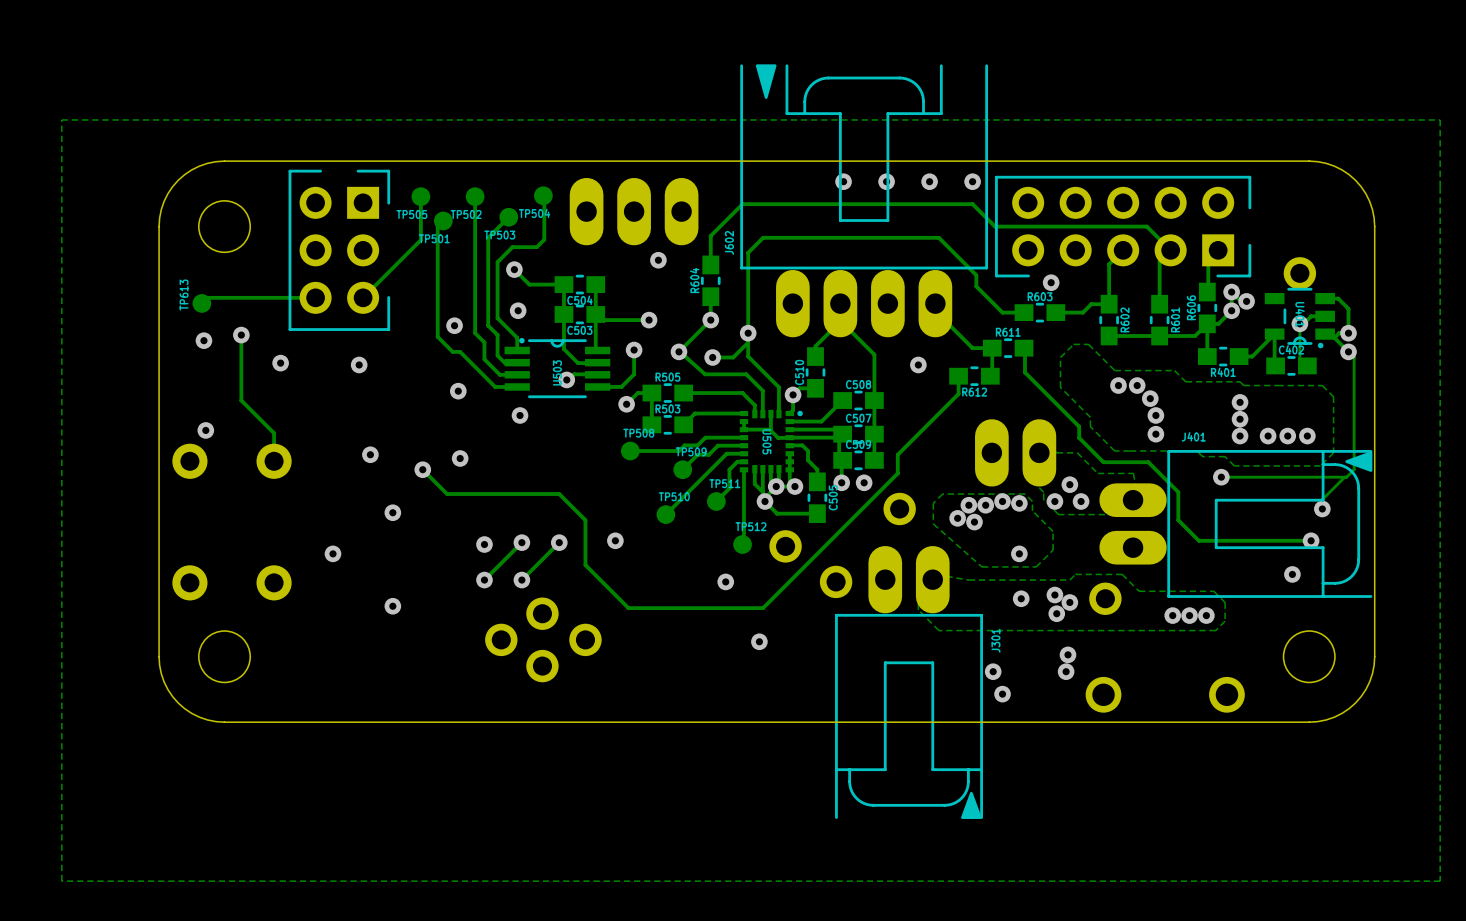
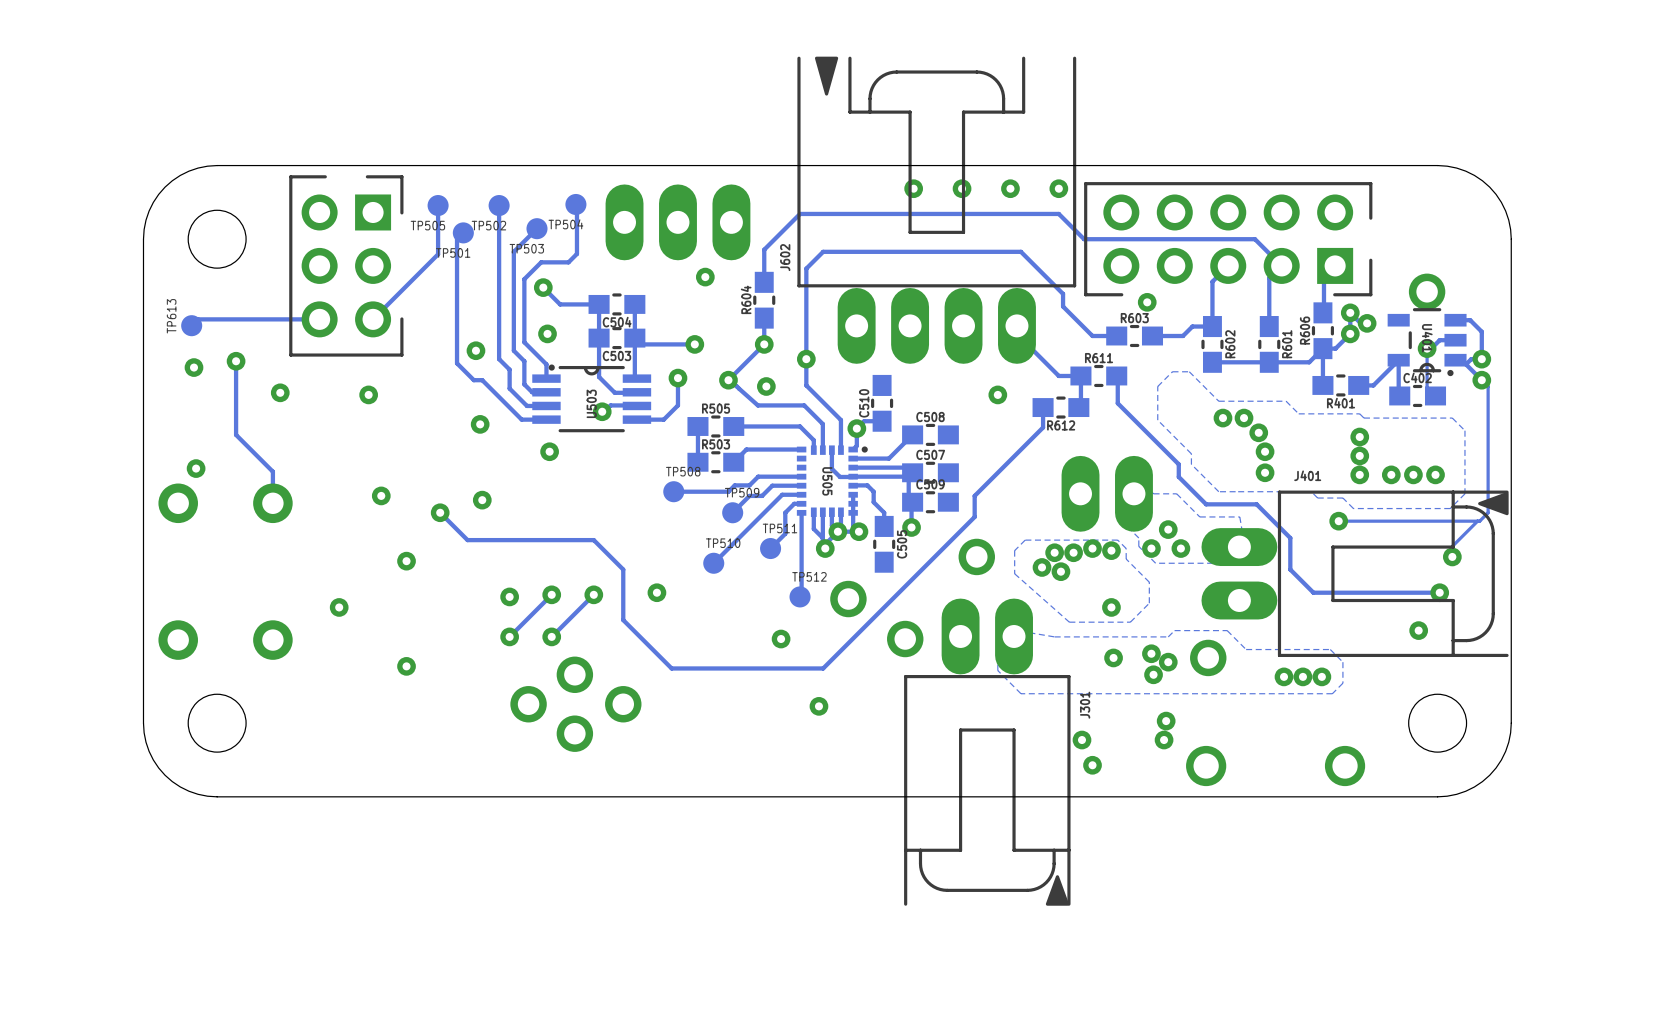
zone outline: (1440, 119) (1440, 881) (61, 881) (61, 119) (1440, 119) -> none
track: (748, 342) (733, 357) (712, 357) -> none
track: (815, 356) (815, 346) (832, 329) (832, 311) (840, 303) (845, 308) (845, 325) (874, 354) (874, 460) -> none
track: (651, 393) (637, 393) (626, 404) -> none
via: (626, 404) -> none
track: (743, 421) (743, 429) (770, 430) -> none
via: (864, 482) -> none
track: (765, 501) (777, 513) (817, 513) -> none

